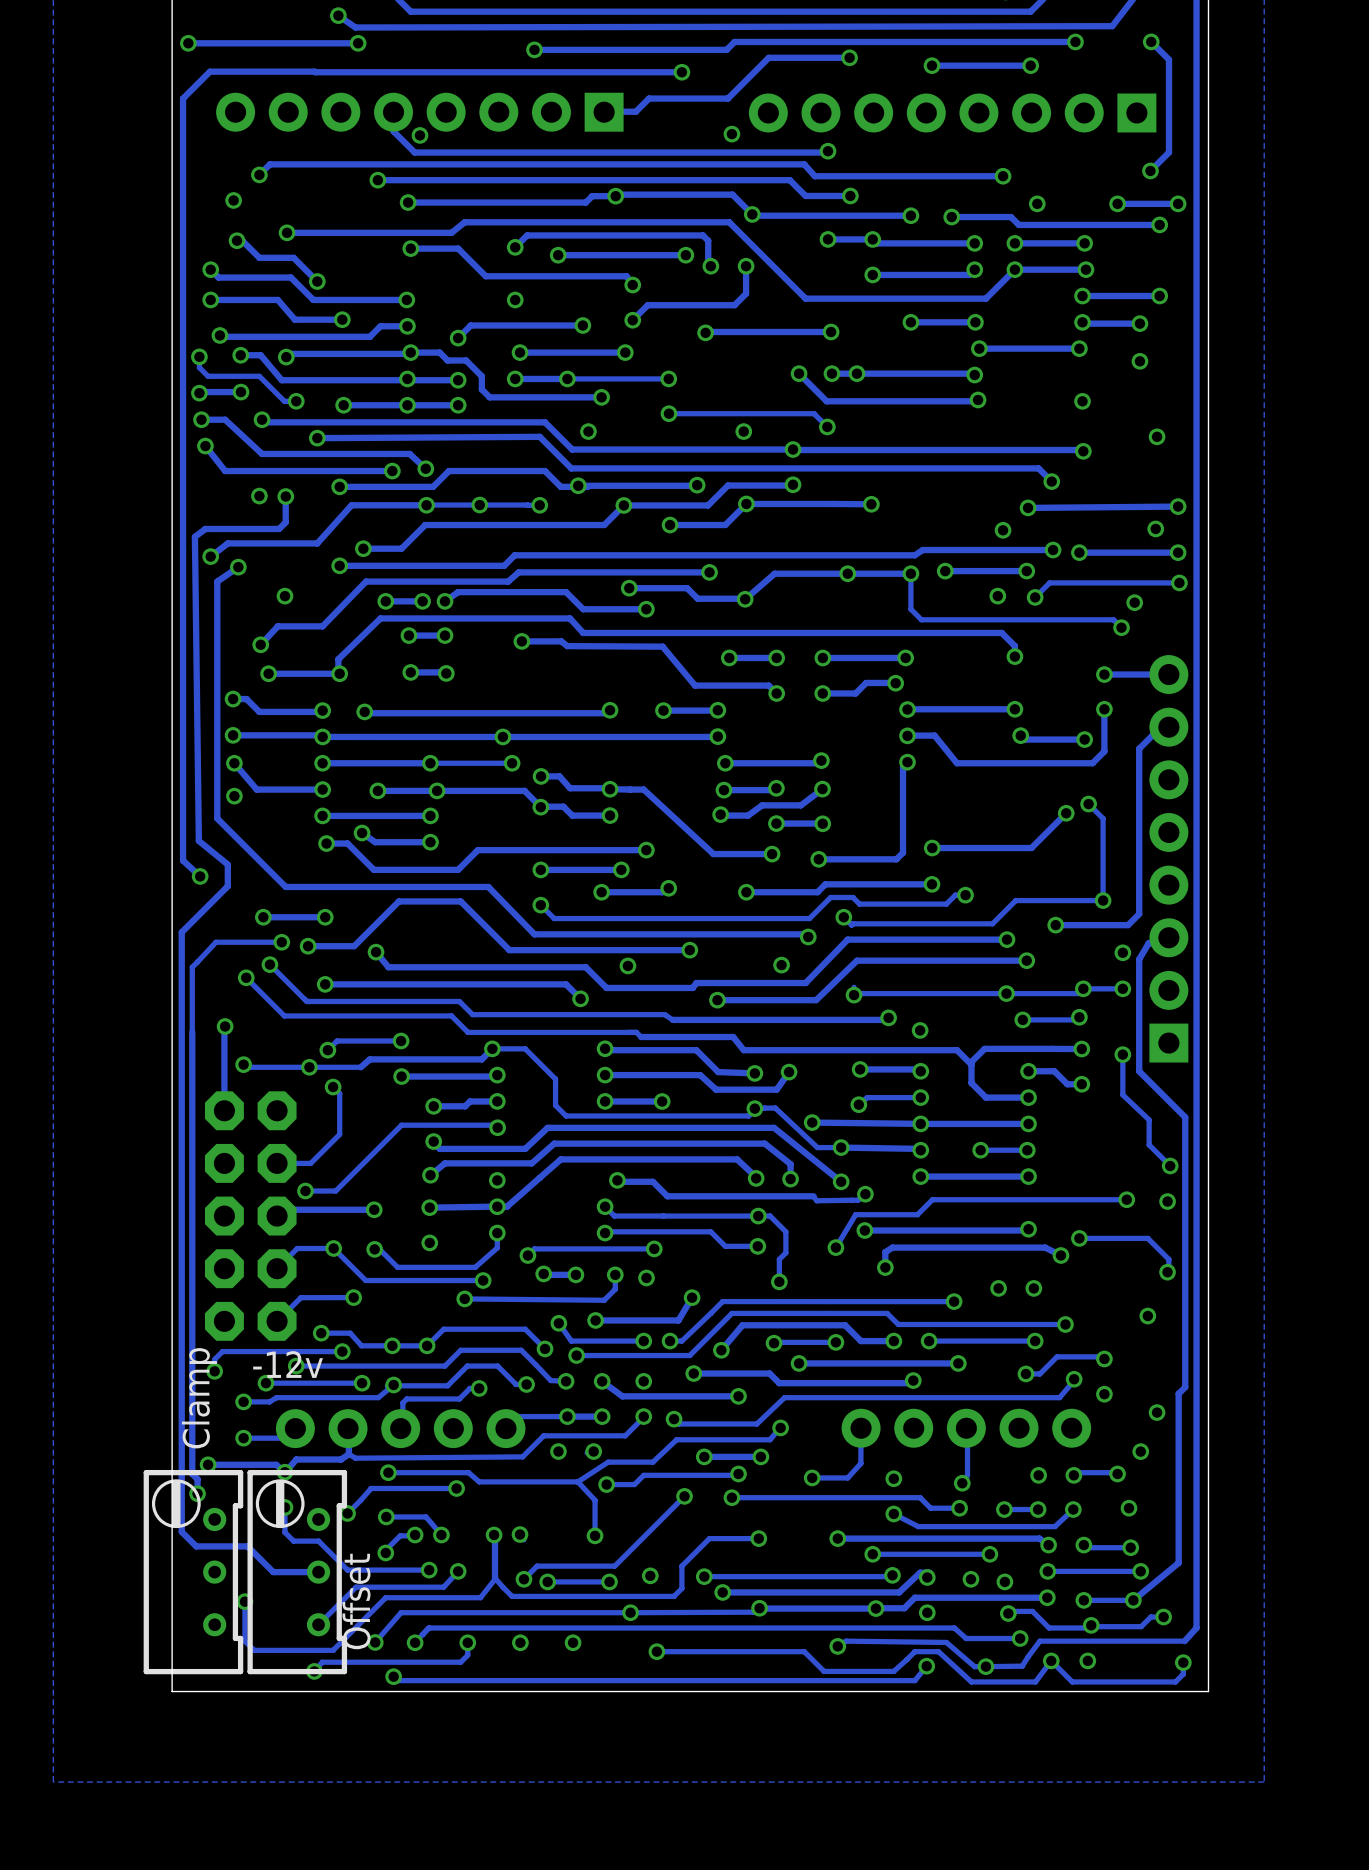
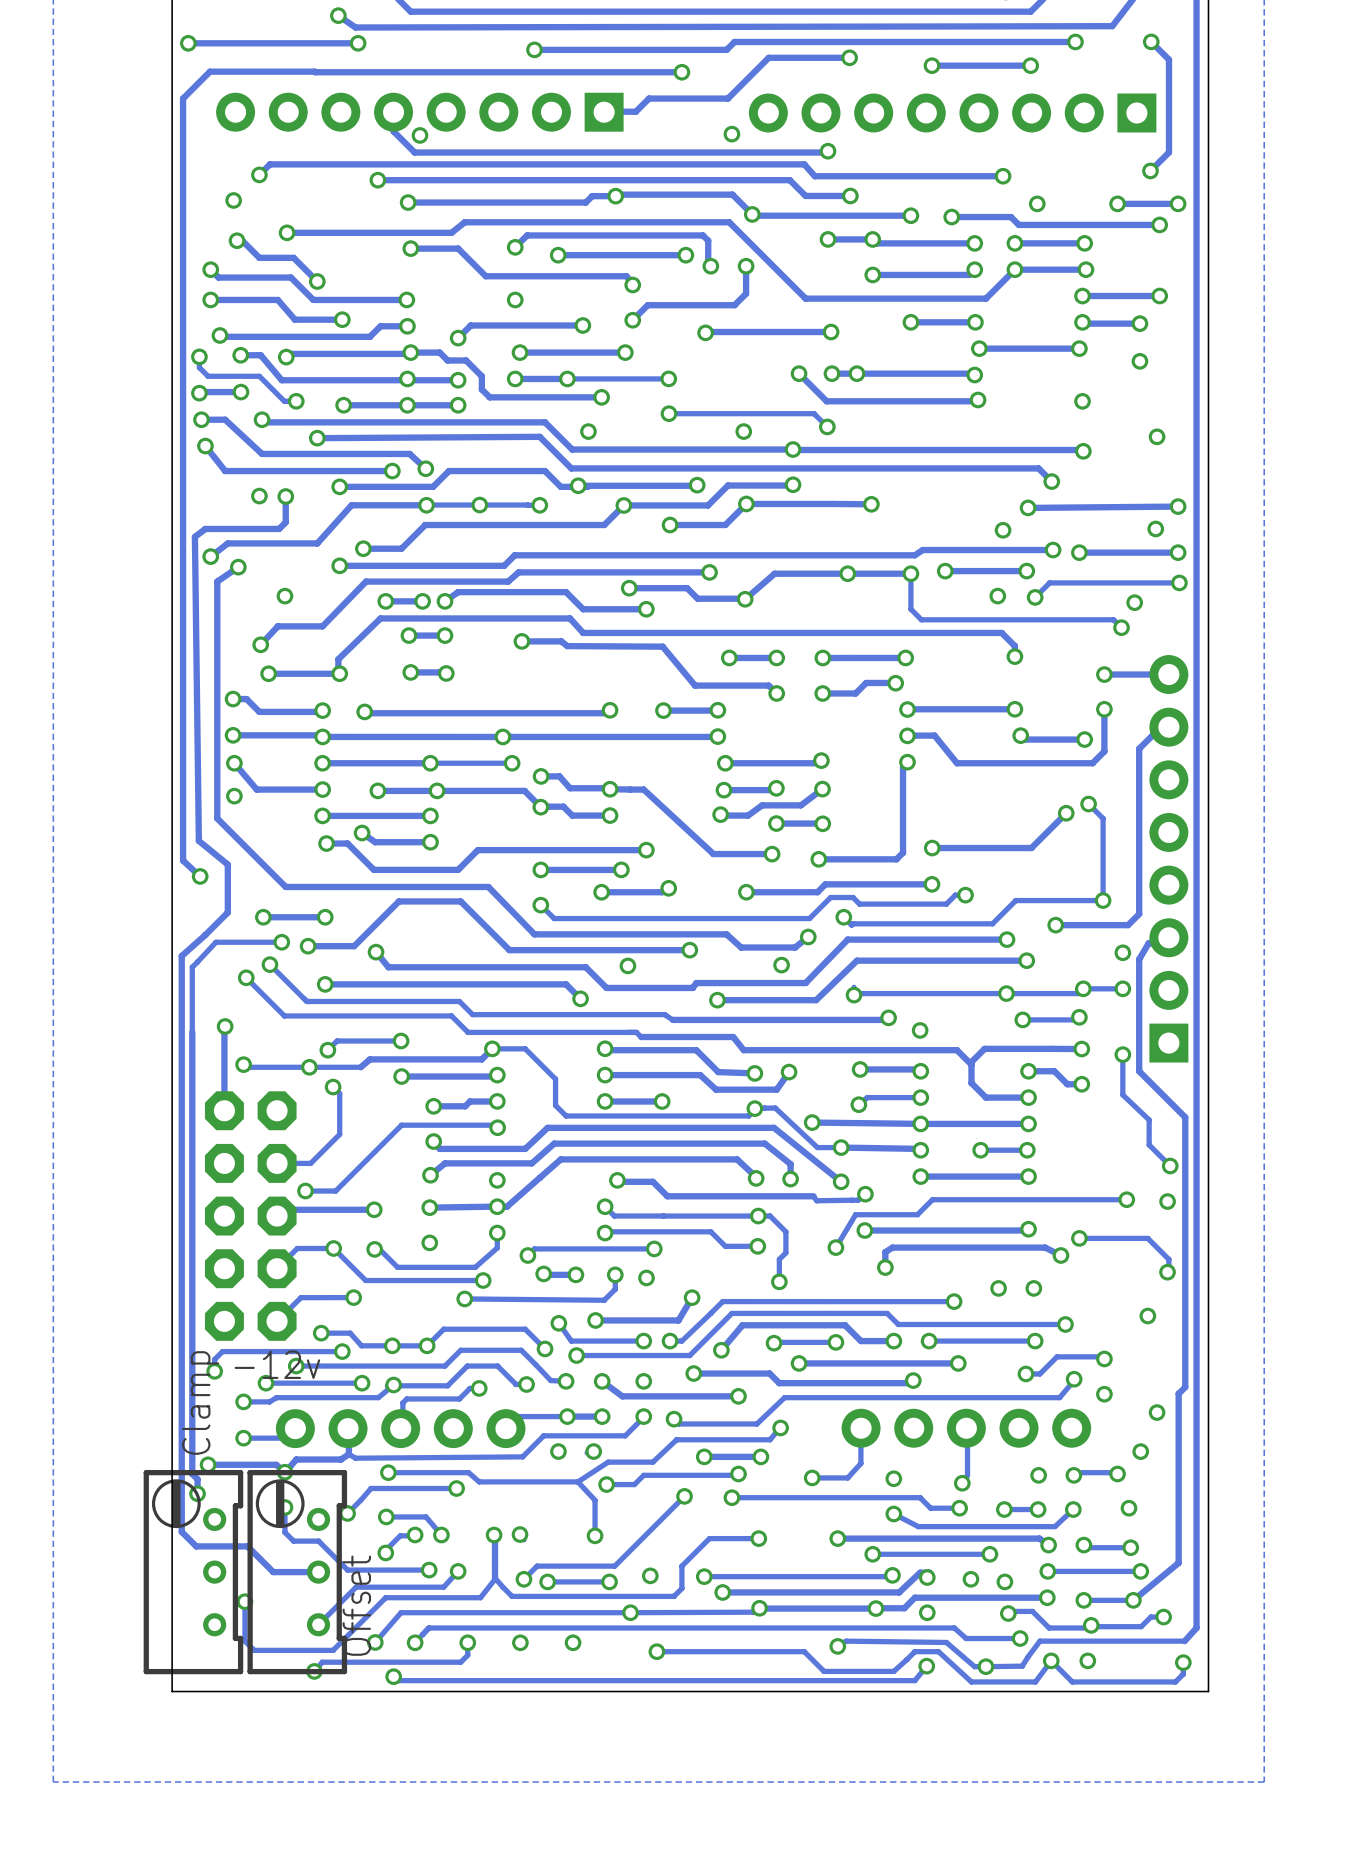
track: (227, 886) (181, 932) (181, 956) -> (227, 886) (227, 912) (181, 956)
track: (726, 934) (805, 934) (808, 936) -> (726, 934) (741, 947) (795, 947) (808, 936)

